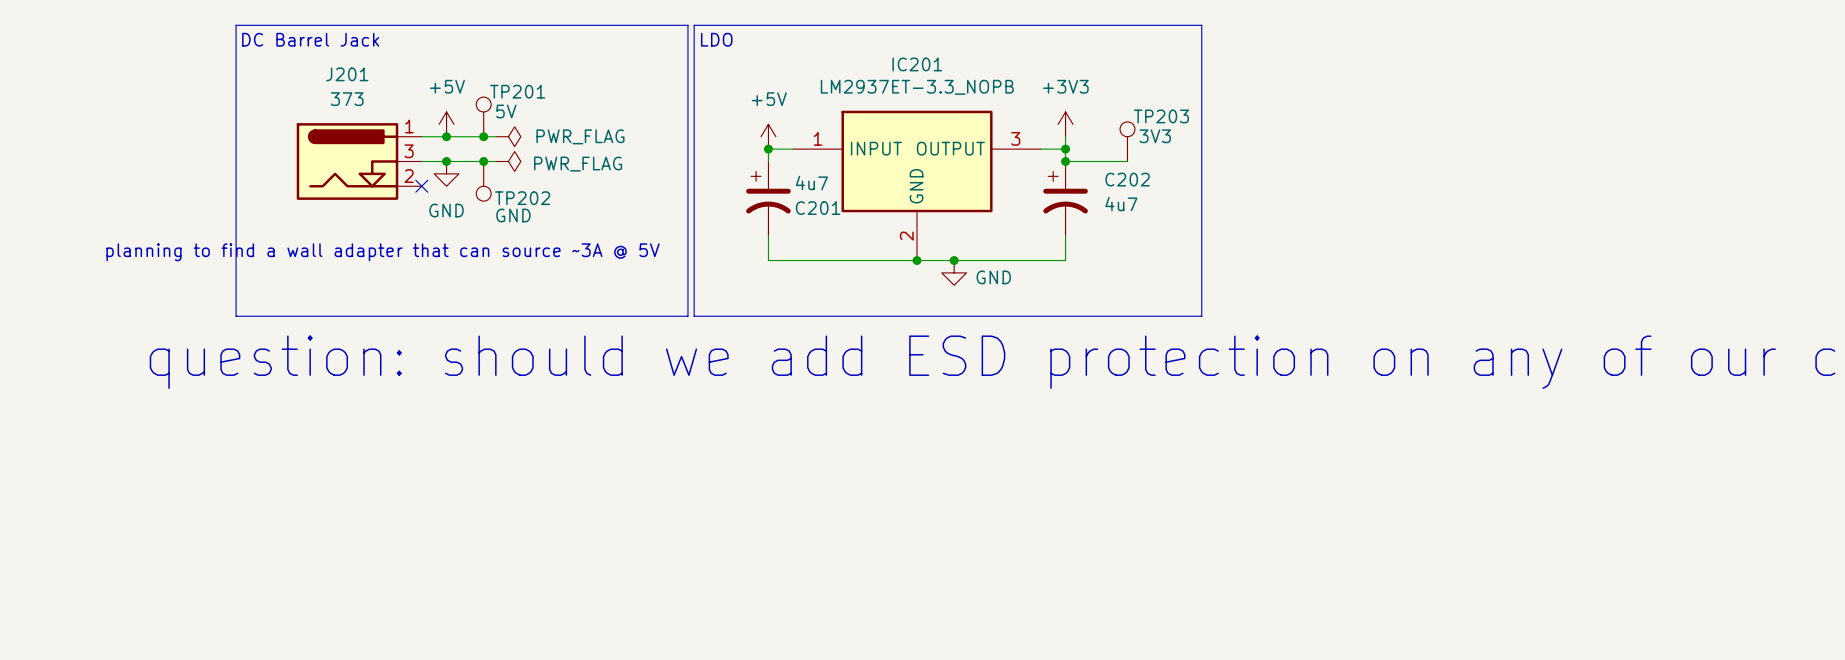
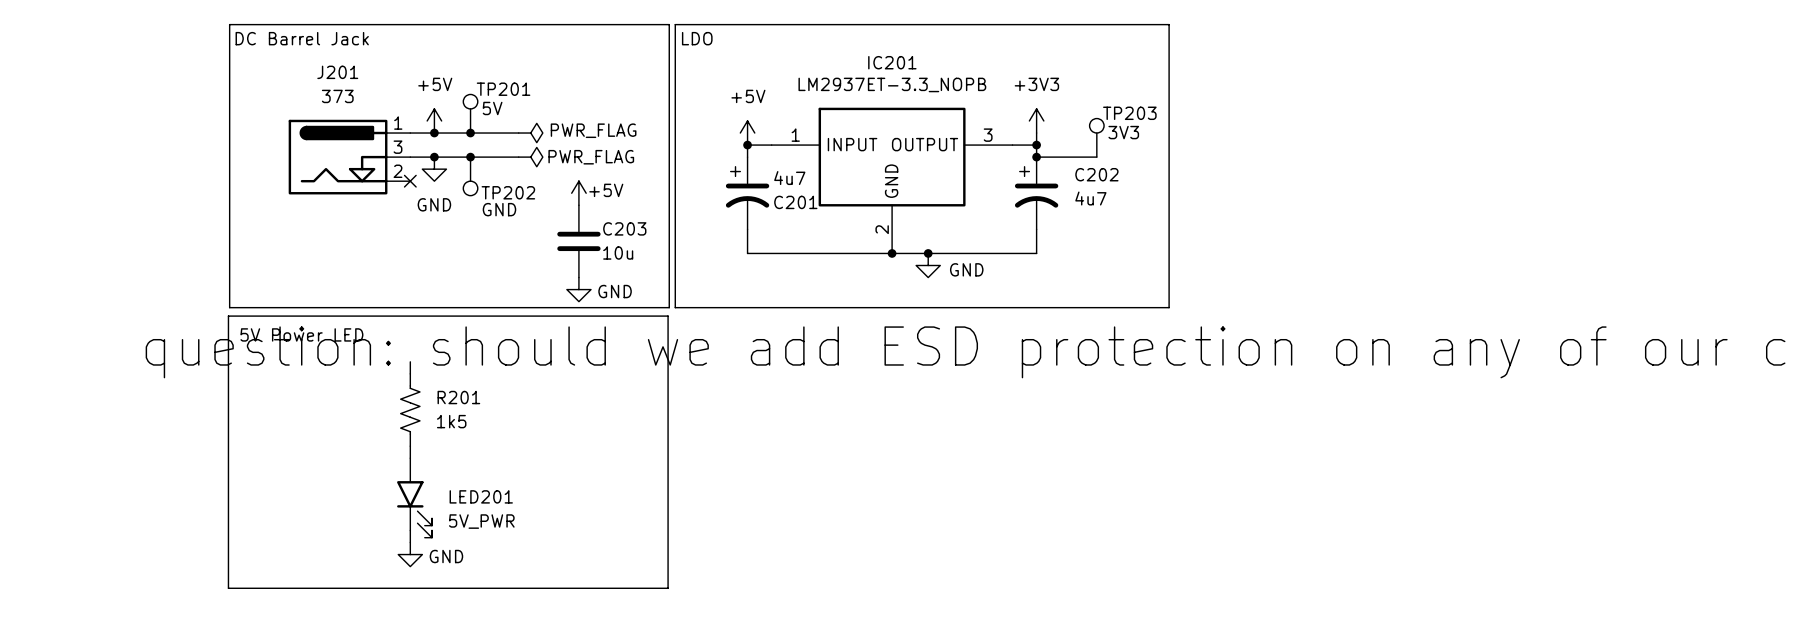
wire: none -> (482, 133) (518, 133)
power symbol: PWR_FLAG (508, 136) -> none
power symbol: none -> PWR_FLAG (530, 133)
wire: none -> (482, 157) (518, 157)
power symbol: PWR_FLAG (508, 161) -> none
power symbol: none -> PWR_FLAG (530, 157)
power symbol: none -> +5V (578, 193)
C203: none -> 10u (578, 241)
text: planning to find a wall adapter that can source ~3A @ 5V (383, 252) -> none
power symbol: none -> GND (578, 289)
line: none -> (228, 316) (668, 316) (668, 588) (228, 588) (228, 316)
text: none -> 5V Power LED (301, 334)
wire: none -> (410, 361) (410, 373)
R201: none -> 1k5 (410, 410)
wire: none -> (410, 446) (410, 458)
LED201: none -> 5V_PWR (414, 497)
wire: none -> (410, 530) (410, 542)
power symbol: none -> GND (410, 554)

